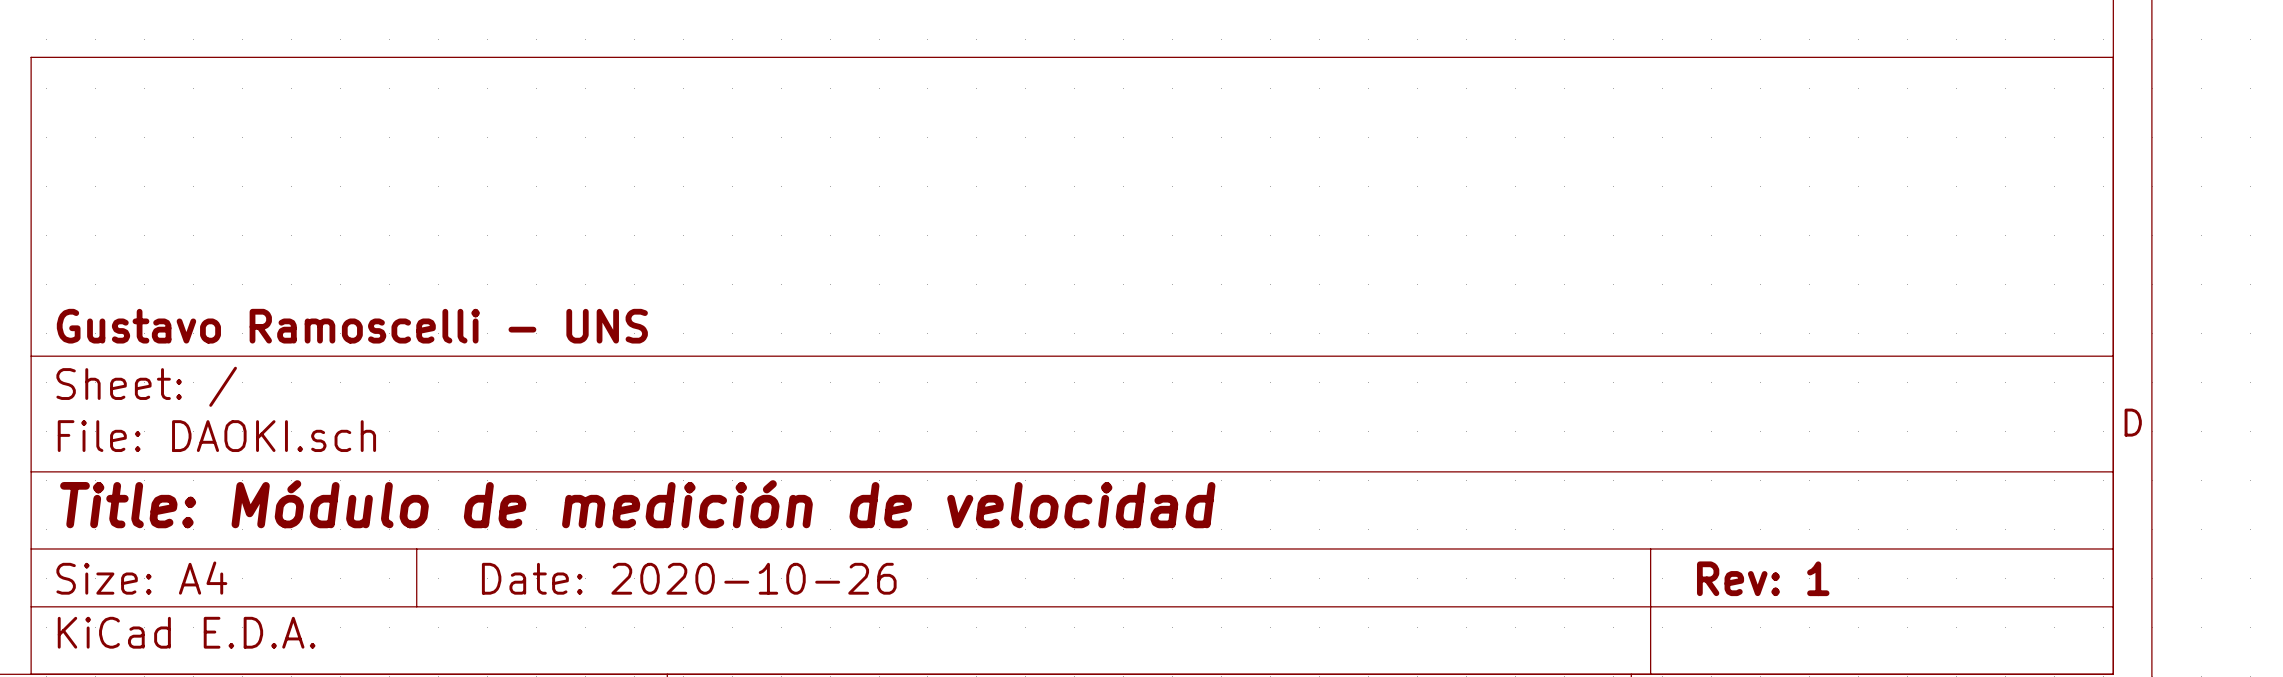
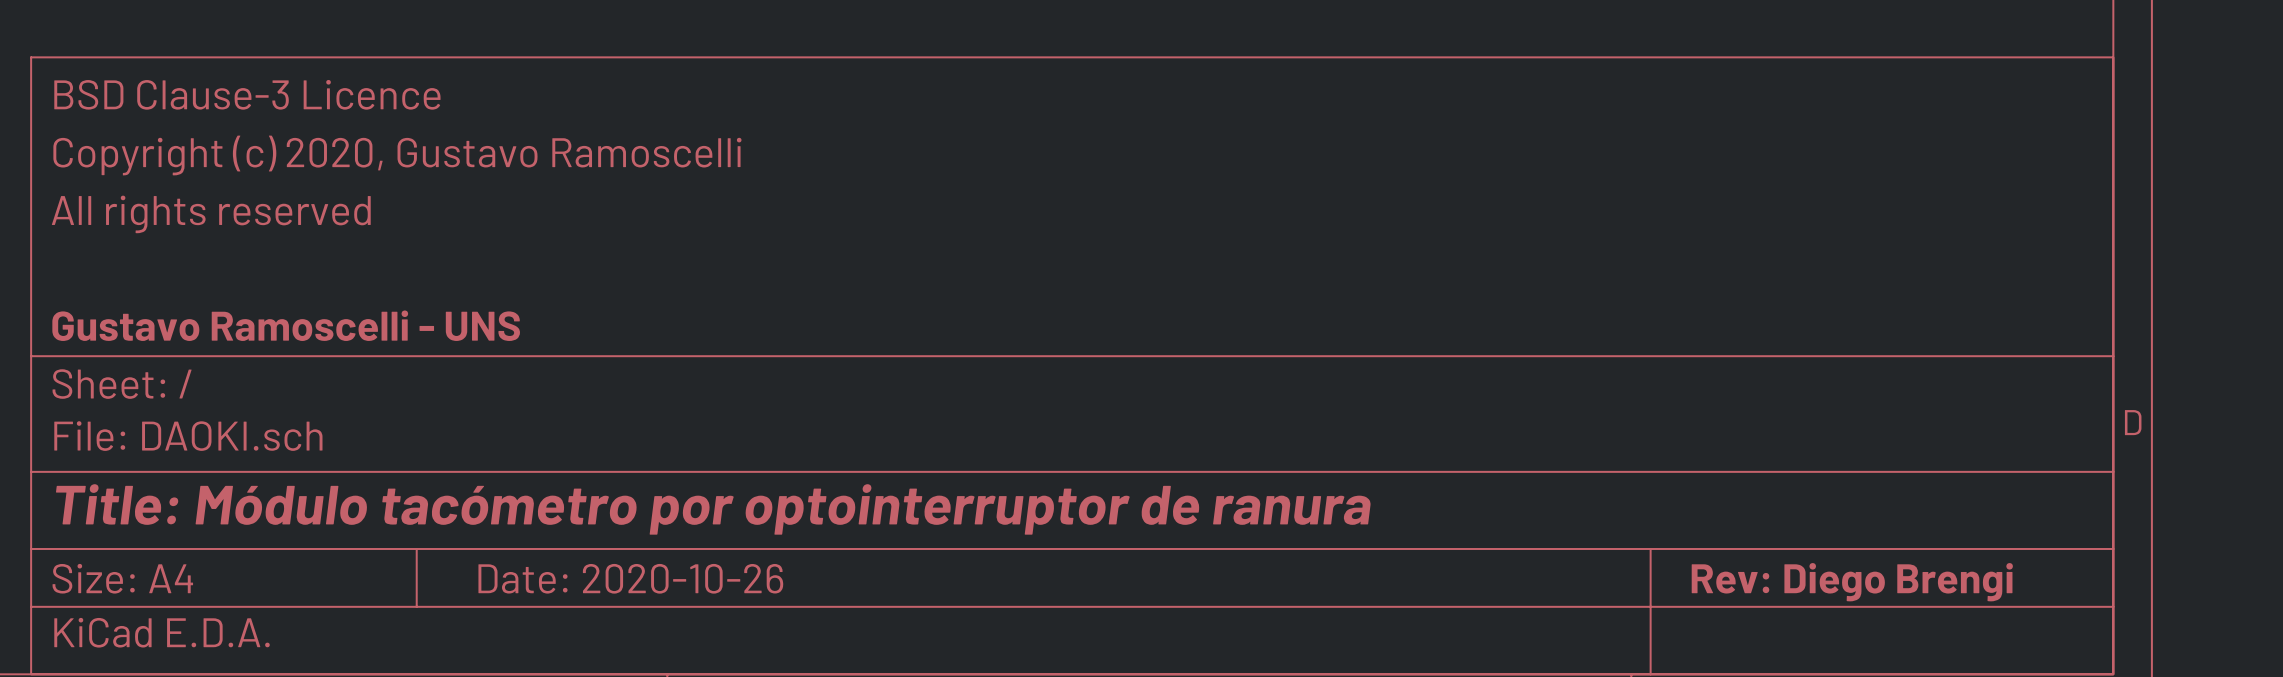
title block: none -> BSD Clause-3 Licence (247, 94)
title block: none -> Copyright (c) 2020, Gustavo Ramoscelli (397, 155)
title block: none -> All rights reserved (211, 214)
title block: Title: Módulo de medición de velocidad (637, 504) -> Title: Módulo tacómetro por optointerruptor de ranura (713, 509)
title block: Rev: 1 (1763, 578) -> Rev: Diego Brengi (1852, 582)

